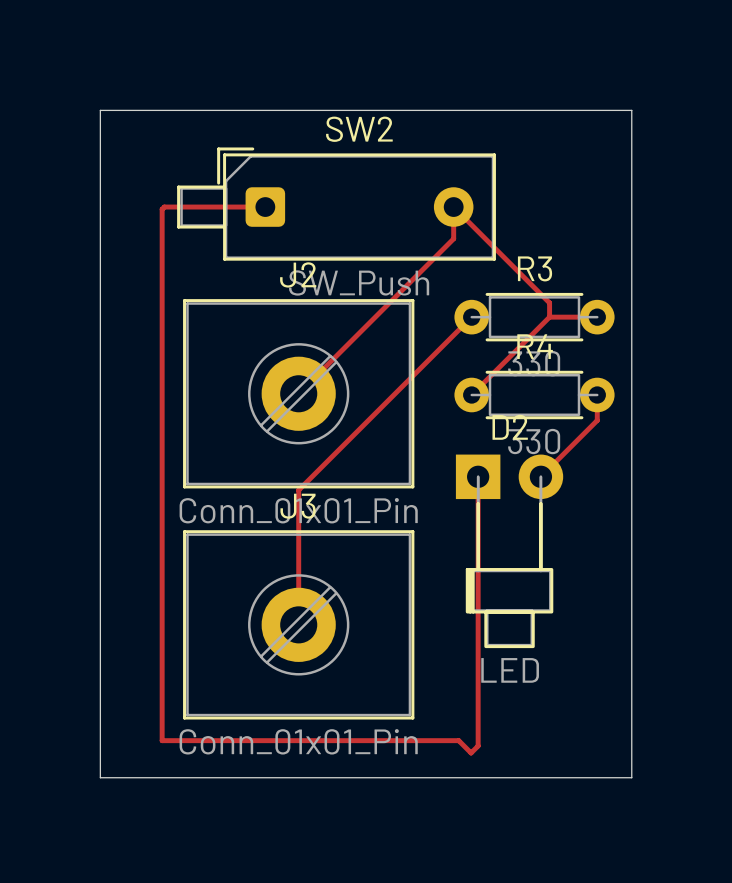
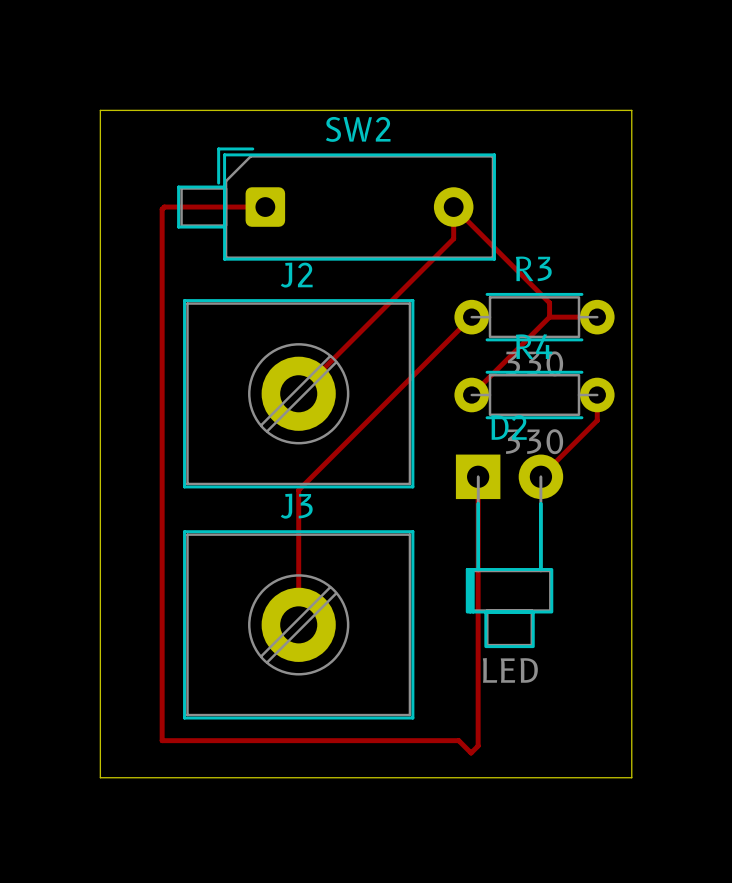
SW2 value: SW_Push (359, 282) -> none
J2 value: Conn_01x01_Pin (298, 510) -> none
J3 value: Conn_01x01_Pin (298, 741) -> none

